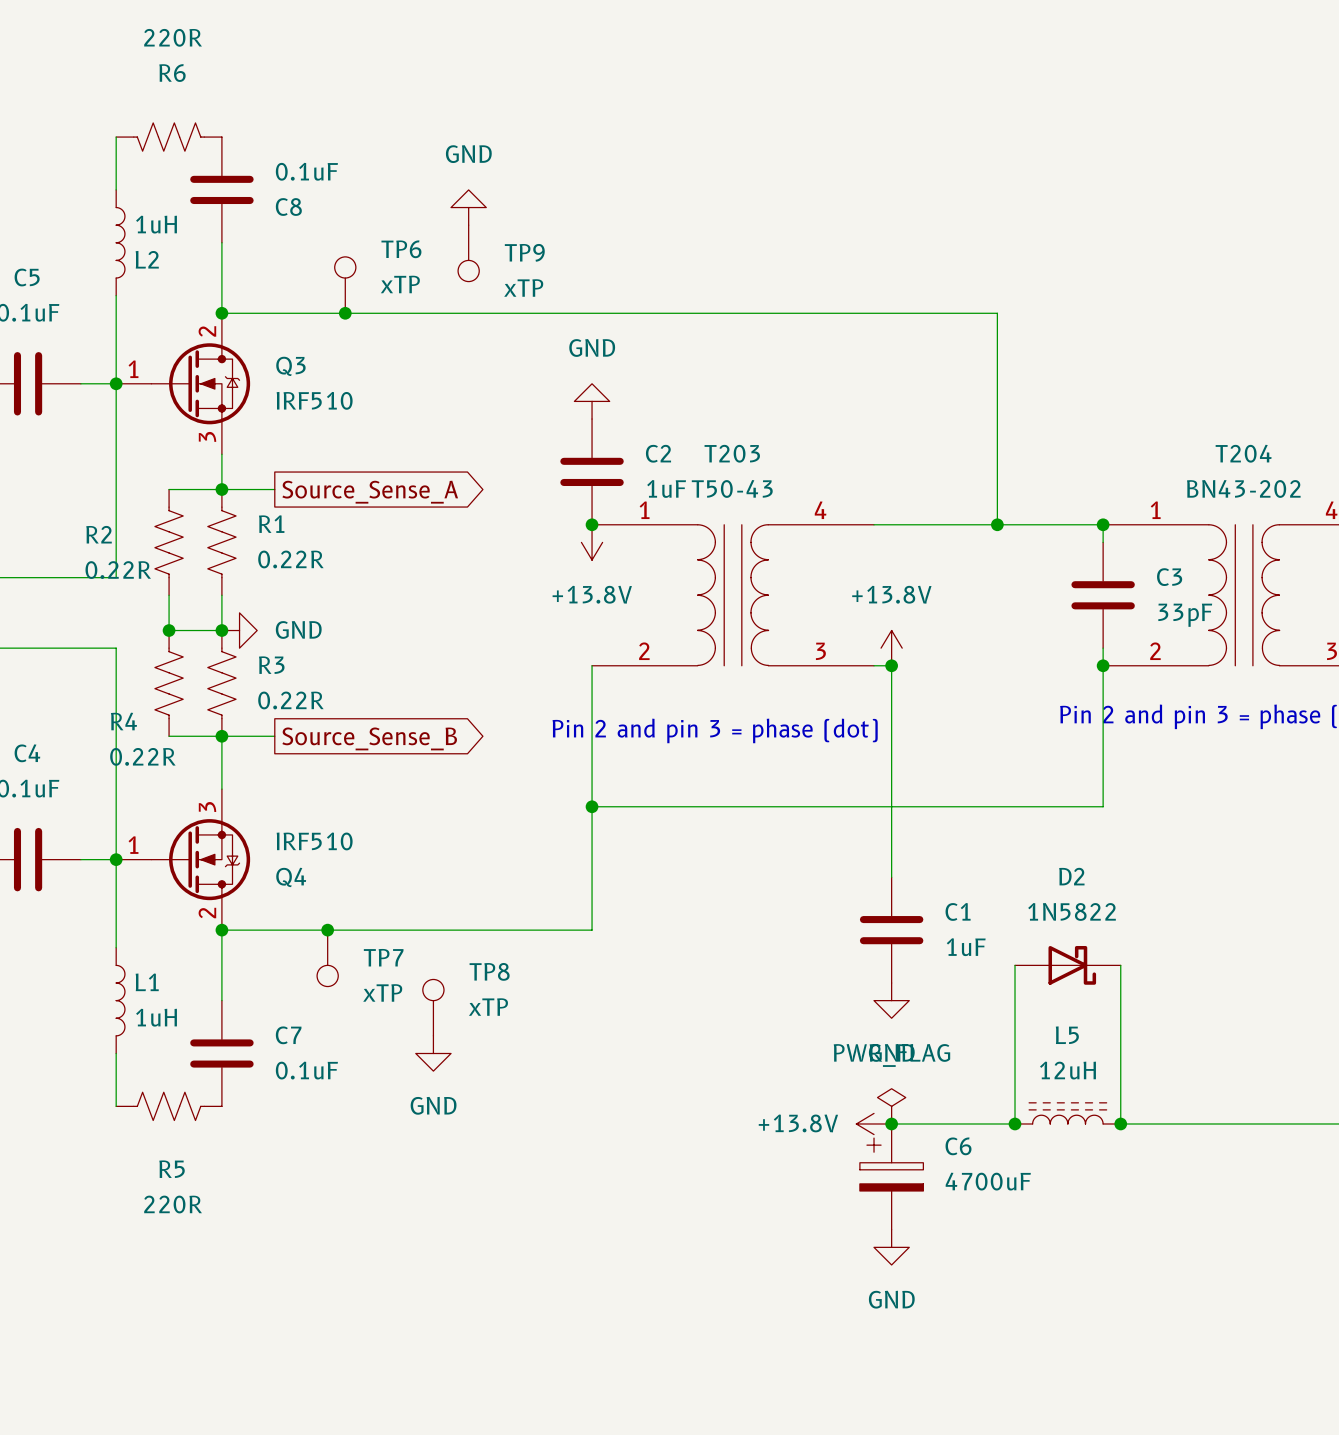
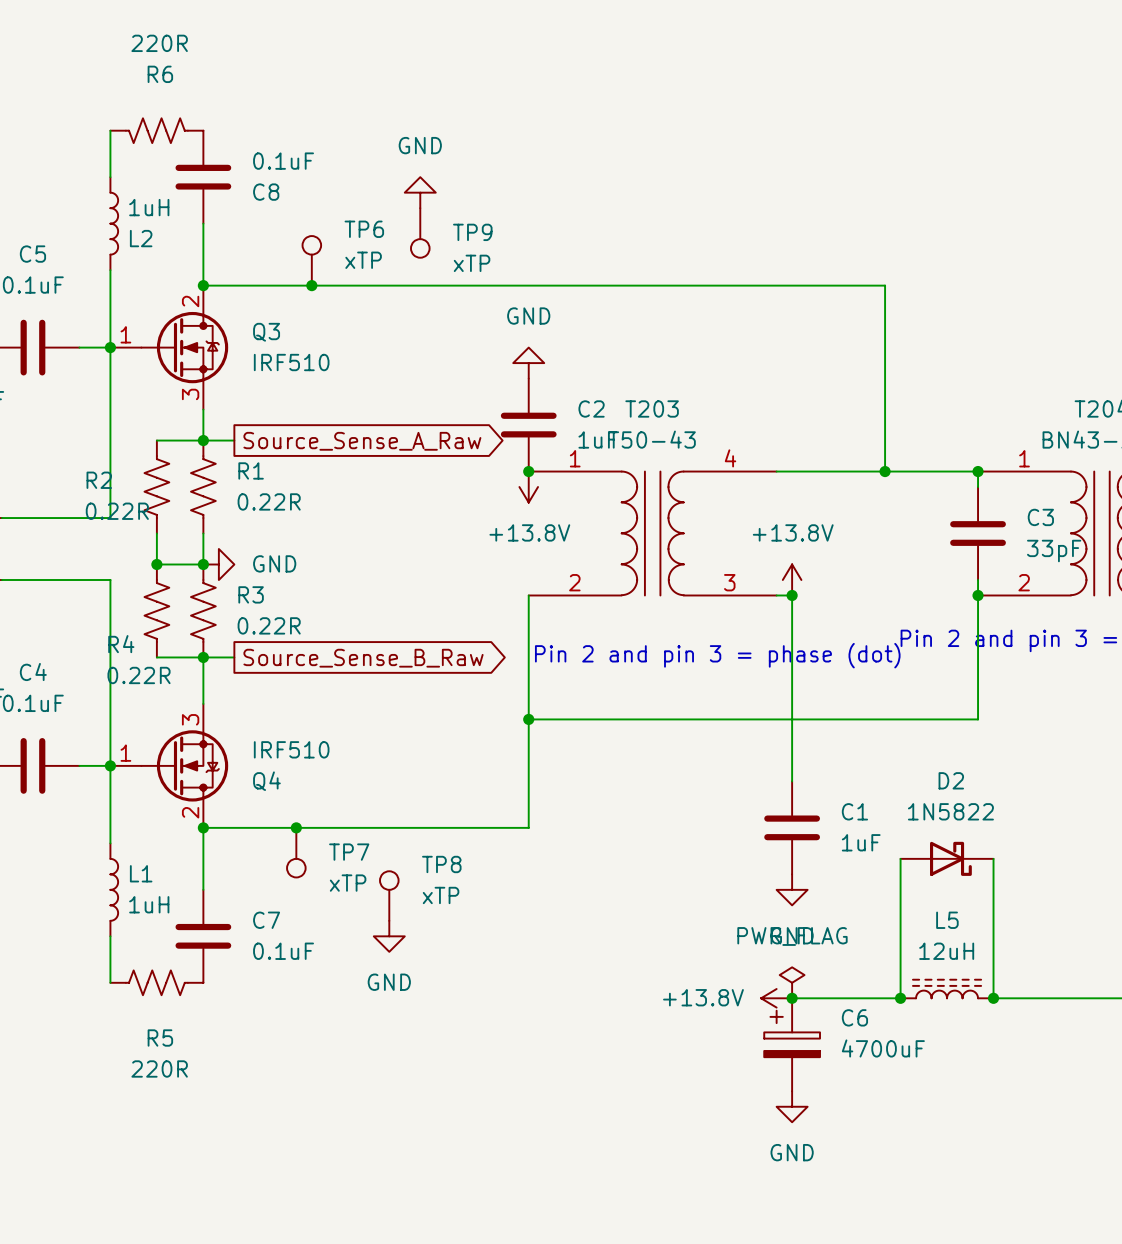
wire: (257, 489) (274, 489) -> none
global label: Source_Sense_A (370, 492) -> Source_Sense_A_Raw (362, 441)
text position: Pin 2 and pin 3 = phase (dot) (715, 730) -> Pin 2 and pin 3 = phase (dot) (717, 655)
wire: (257, 736) (274, 736) -> none
global label: Source_Sense_B (369, 738) -> Source_Sense_B_Raw (363, 658)

